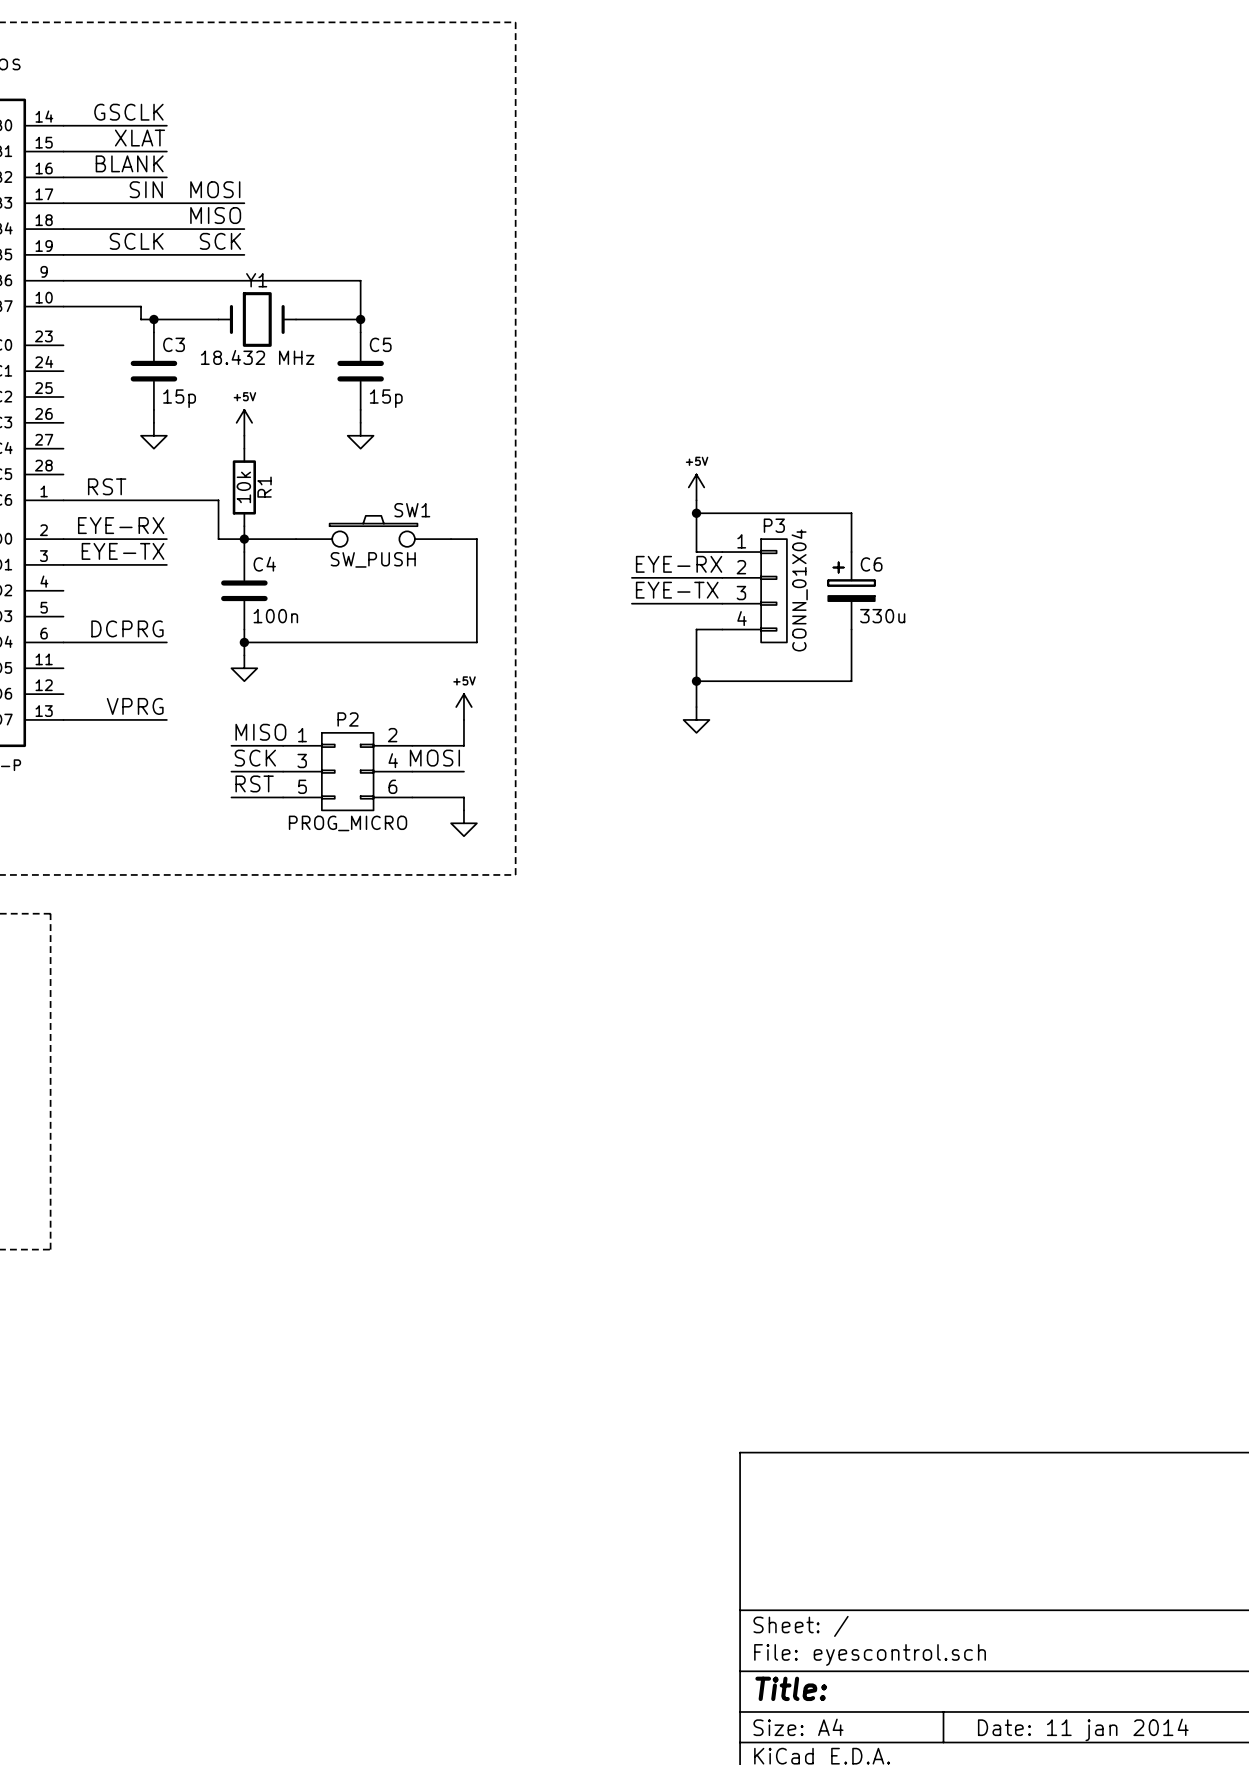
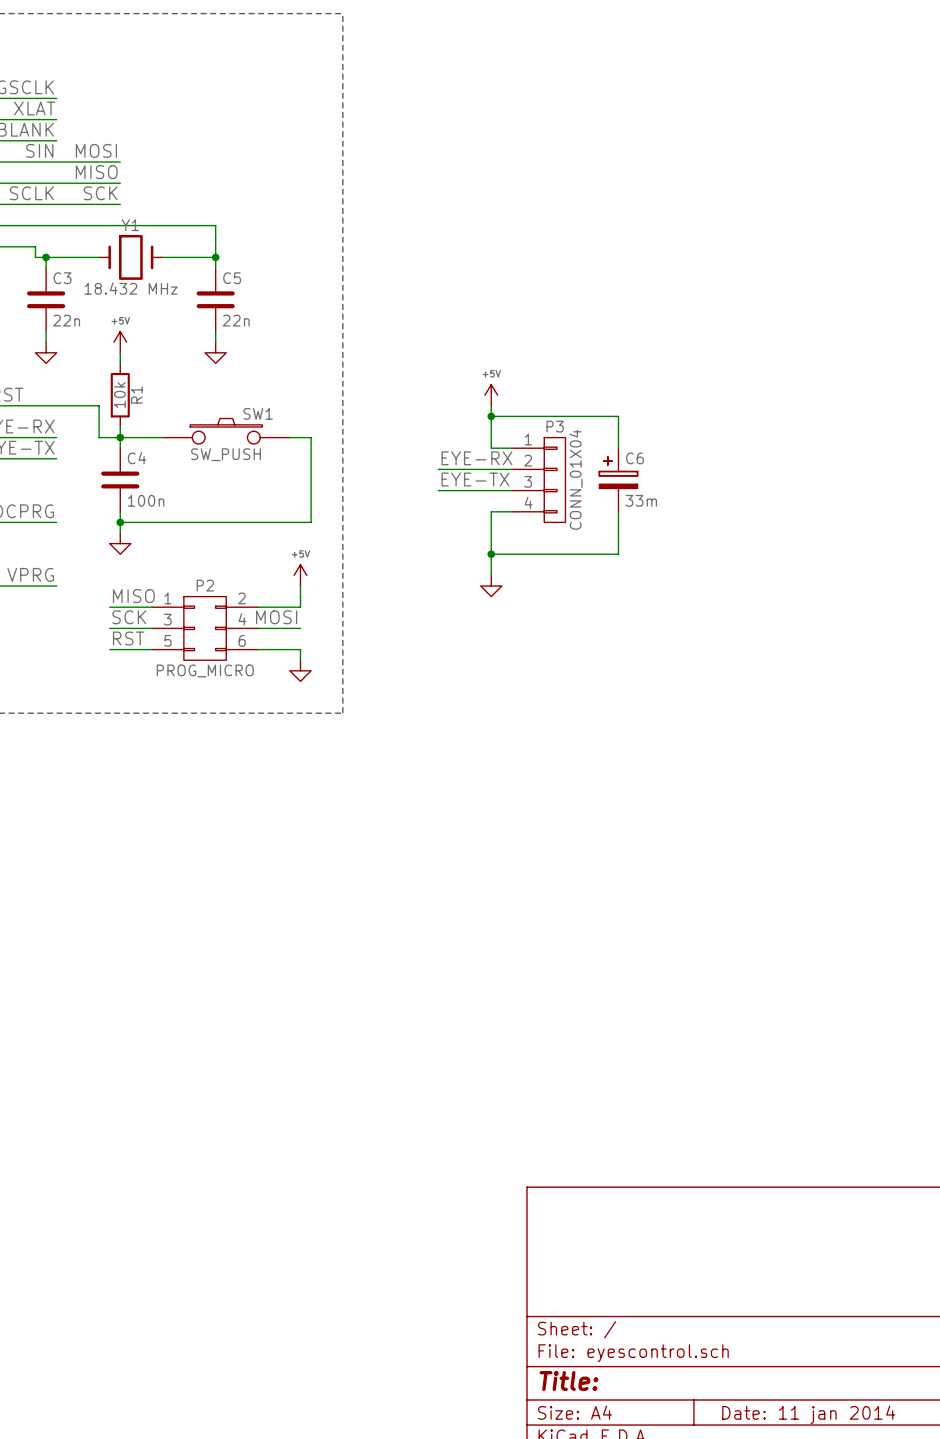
C3 value: 15p (179, 398) -> 22n (66, 320)
C5 value: 15p (386, 398) -> 22n (236, 320)
C6 value: 330u (882, 616) -> 33m (641, 500)

